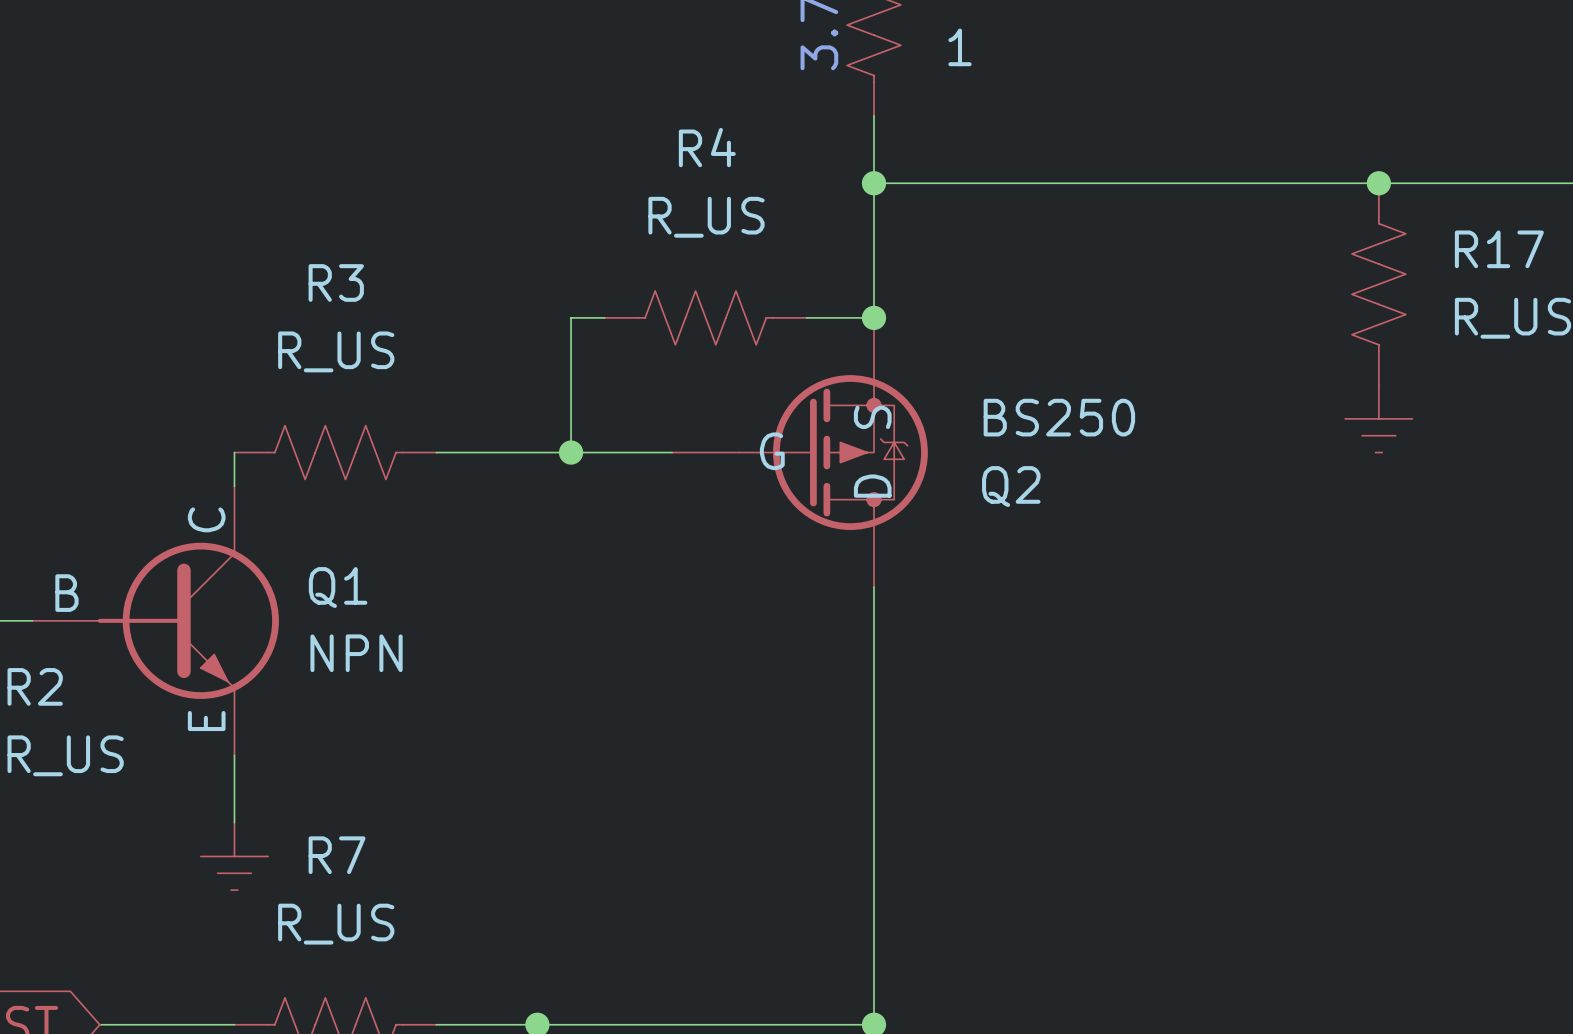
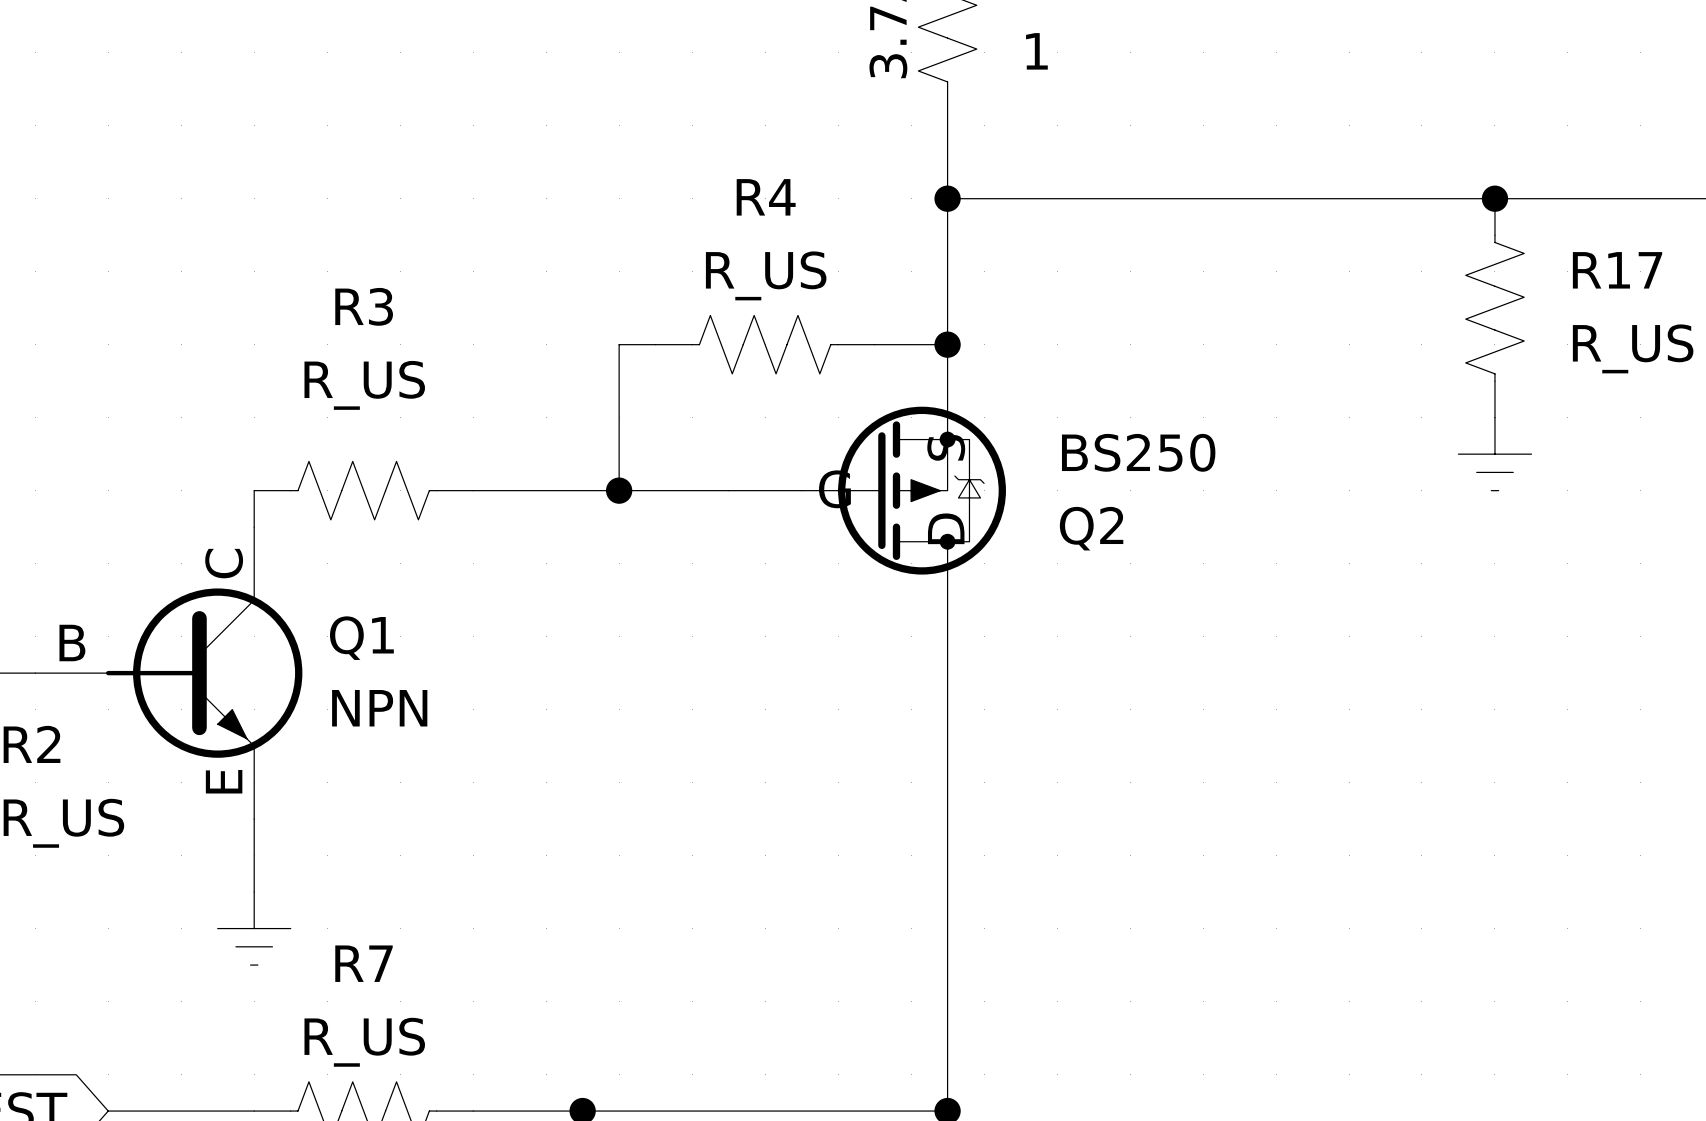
R4 name position: R4 (707, 147) -> R4 (766, 197)
R4 value position: R_US (706, 217) -> R_US (766, 275)
R7 name position: R7 (337, 855) -> R7 (364, 963)
R7 value position: R_US (336, 924) -> R_US (364, 1042)

